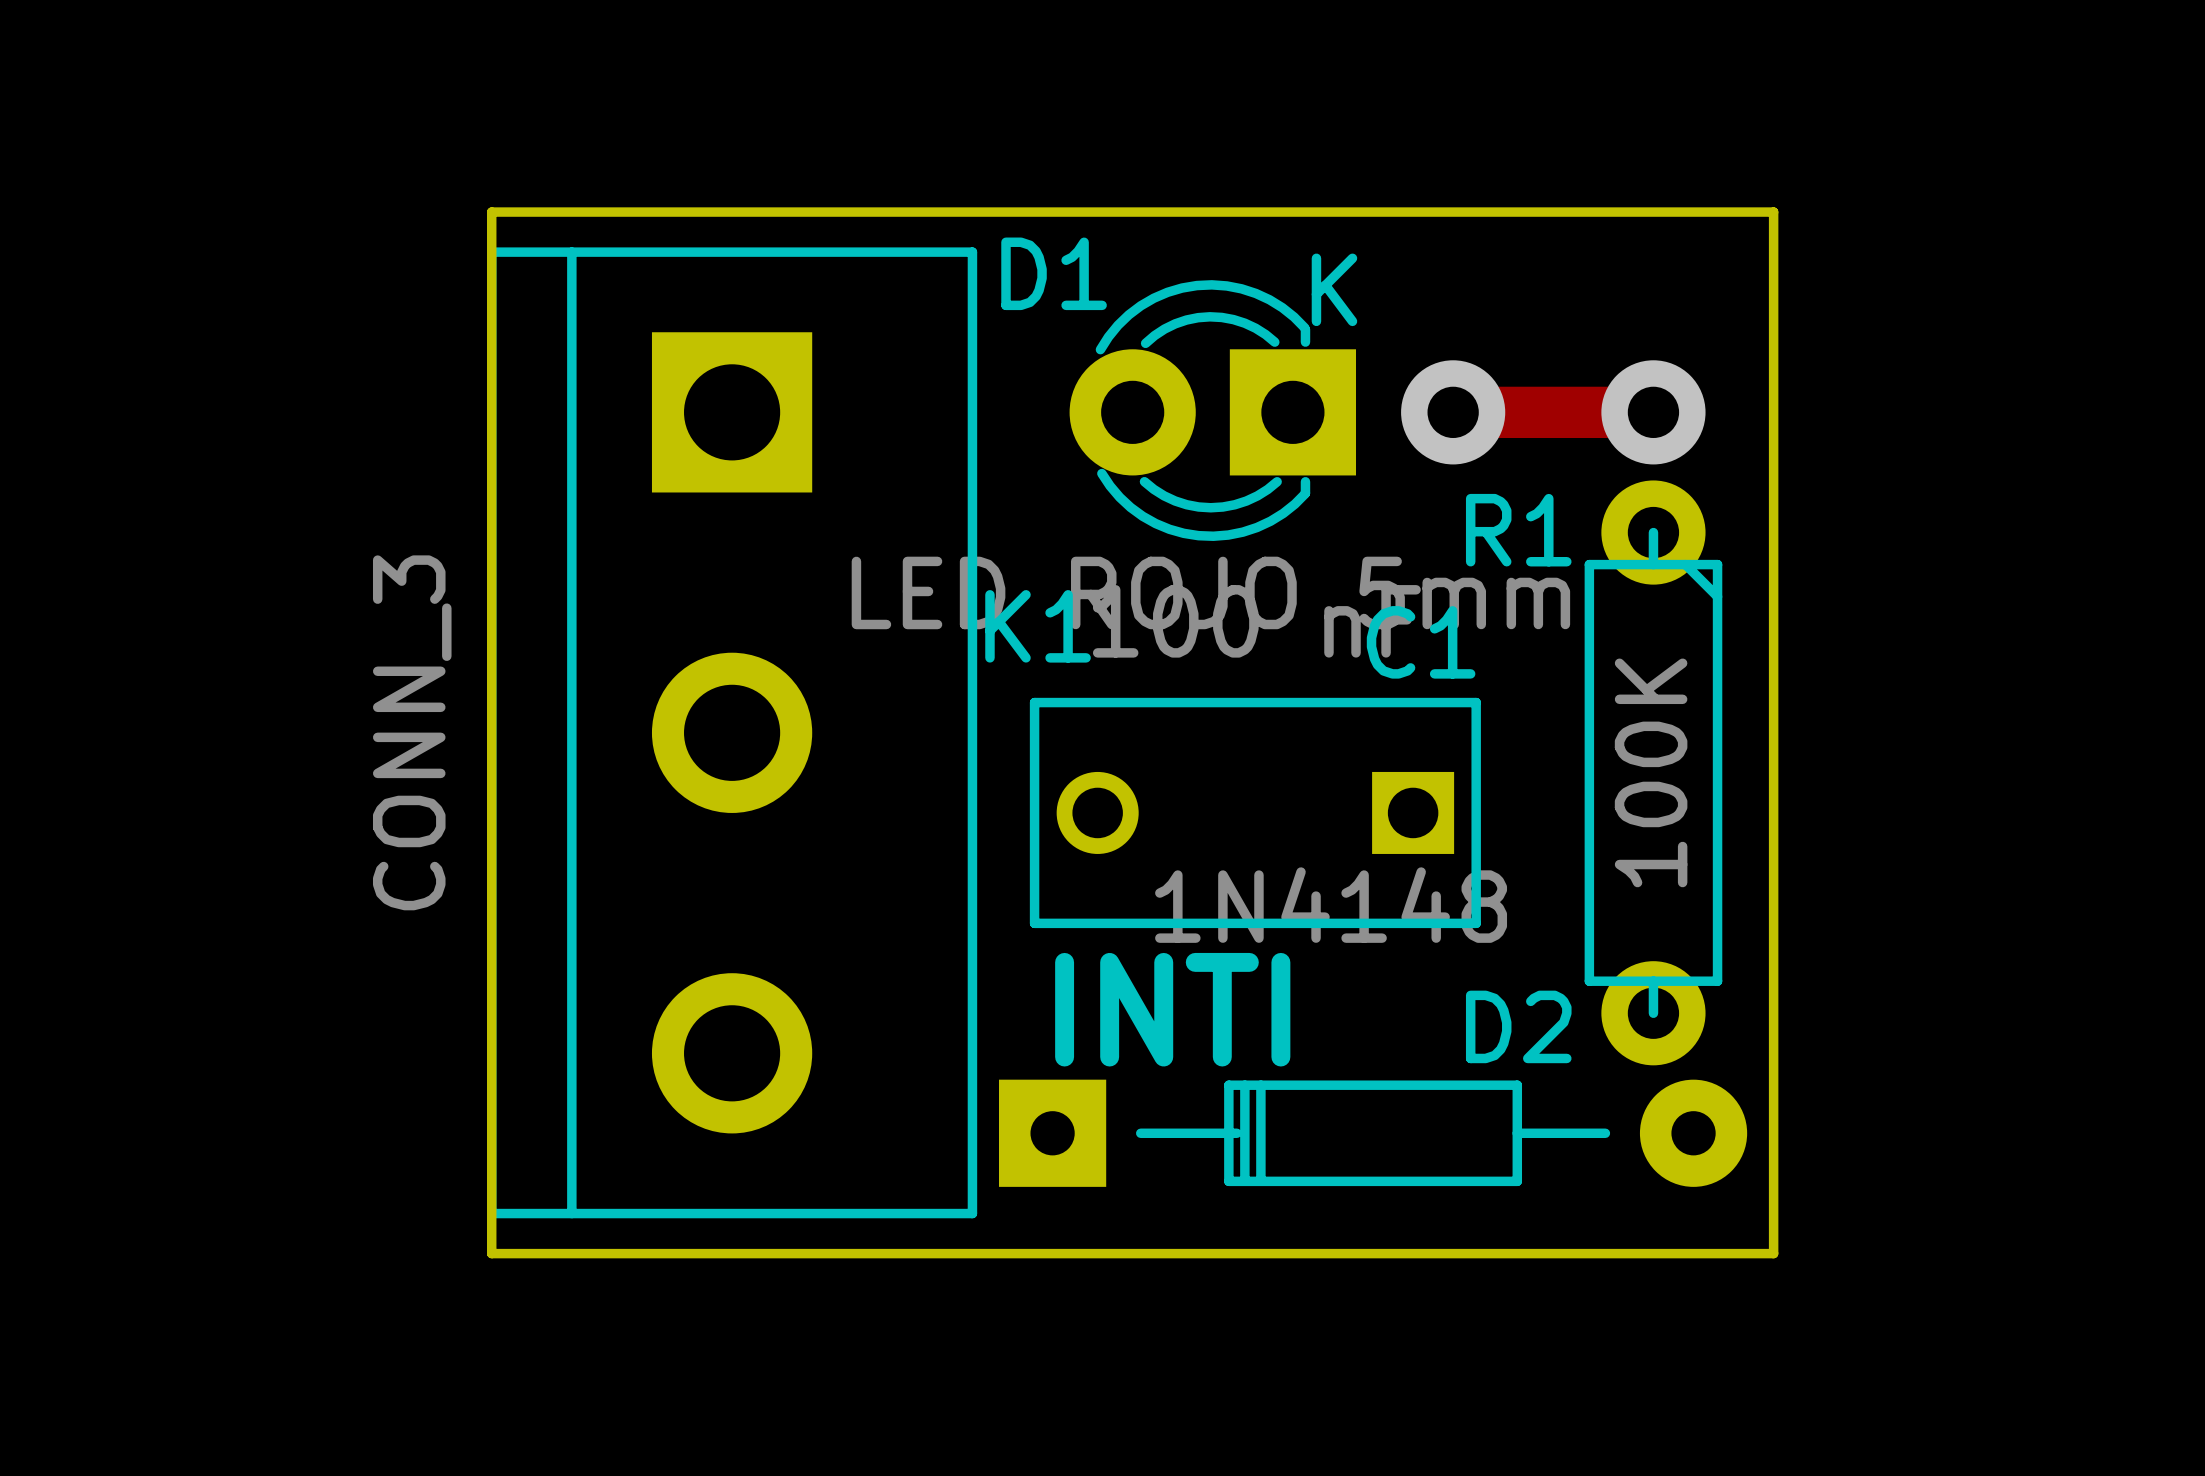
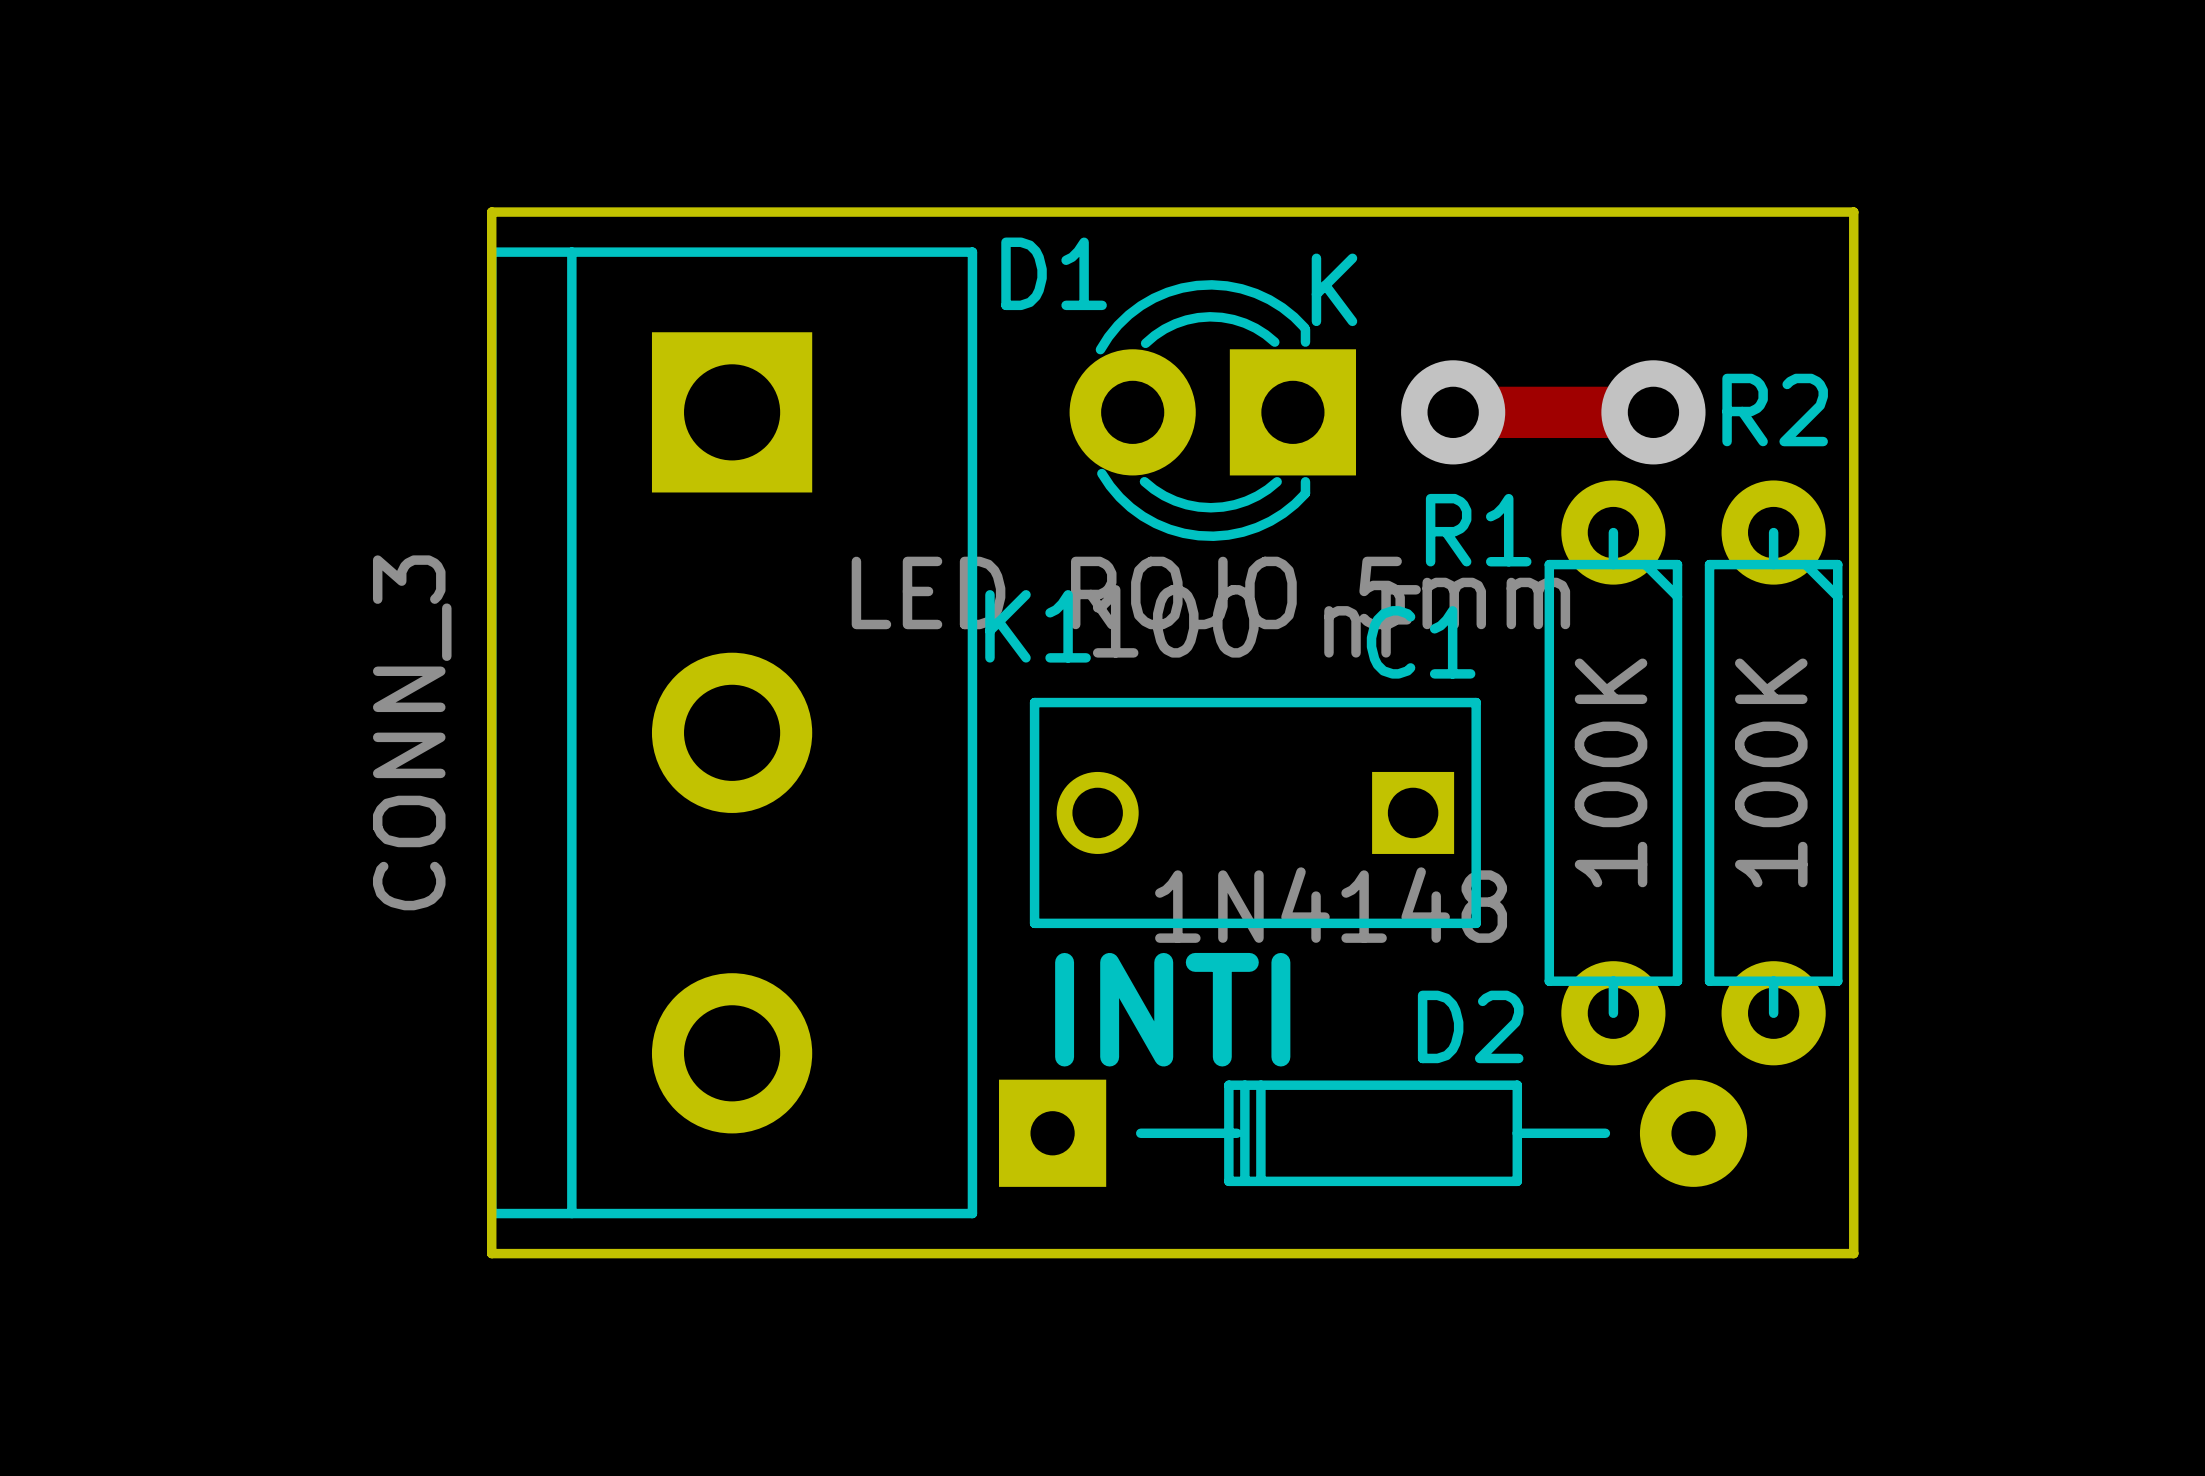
board edge: (1773, 212) (1773, 1253) -> (1773, 212) (1853, 212) (1853, 1253) (1773, 1253)
R1 position: (1653, 772) -> (1613, 772)
R2: none -> 100K (1773, 772)
D2 name position: D2 (1518, 1026) -> D2 (1470, 1026)

